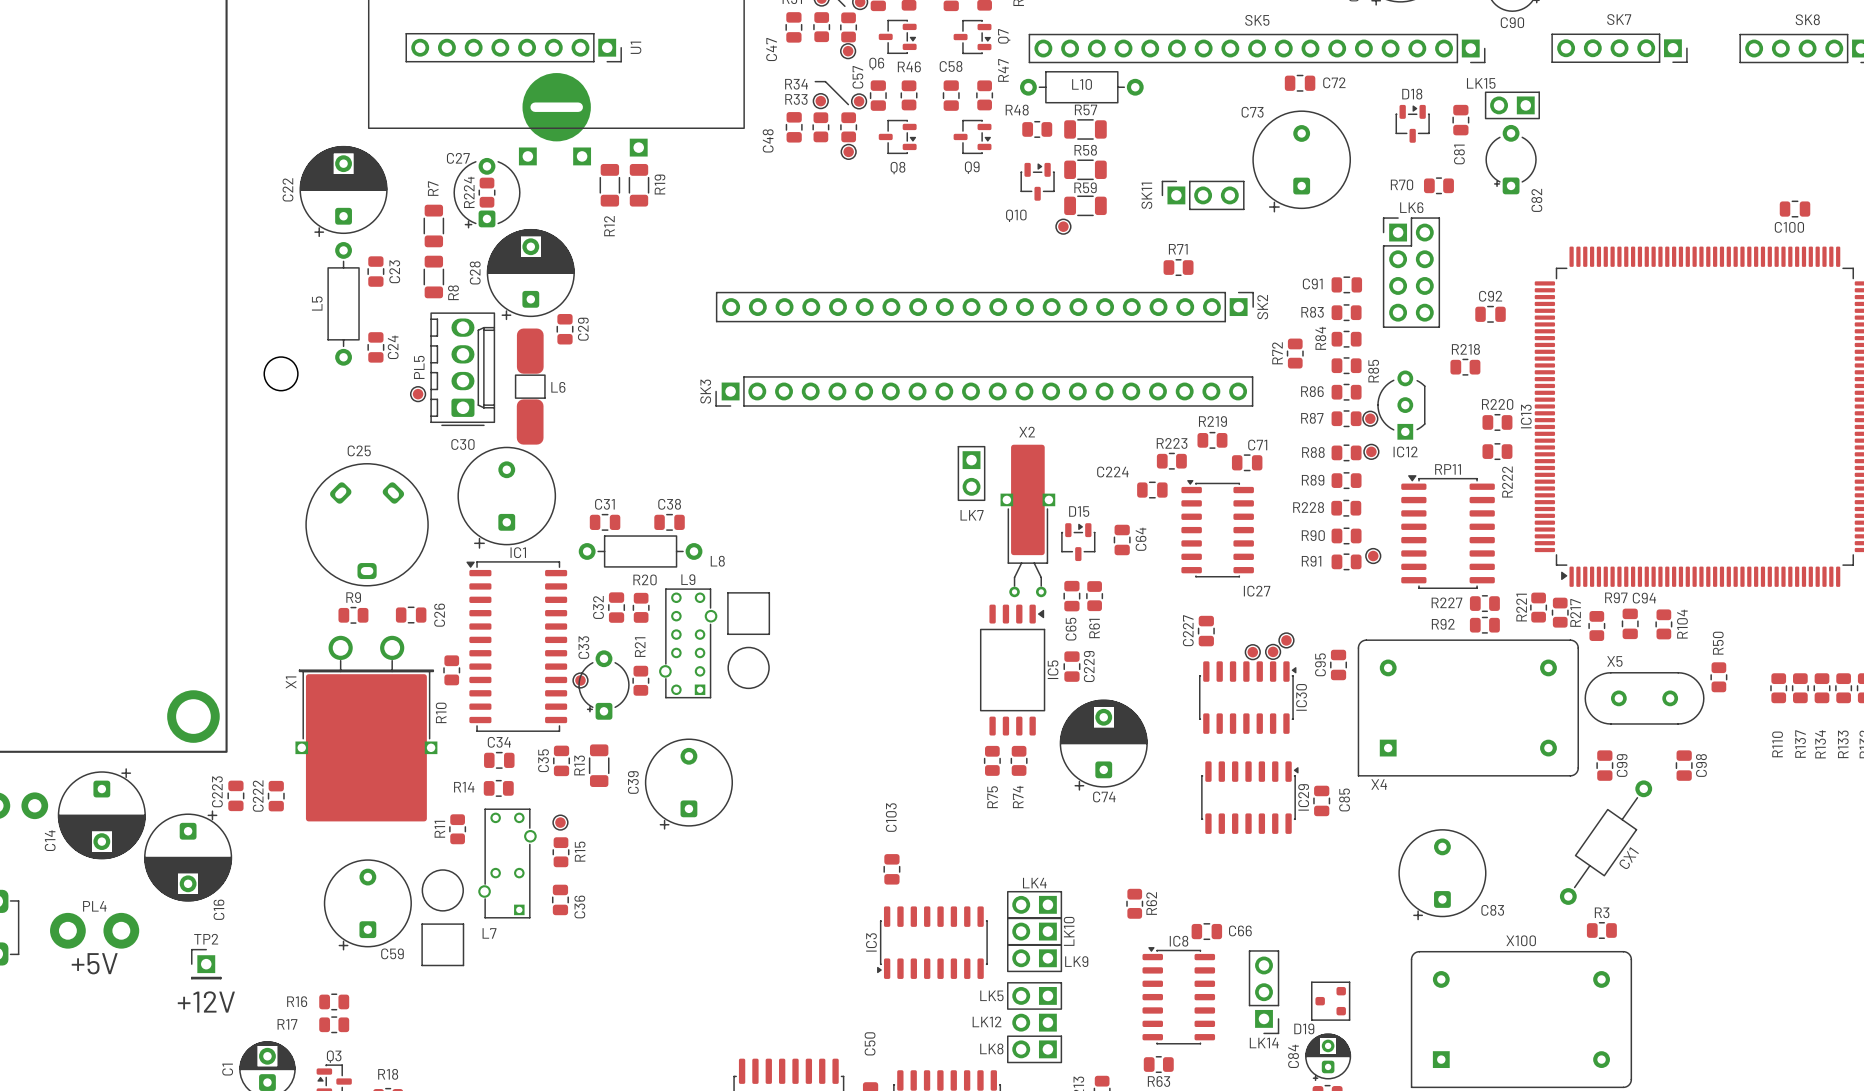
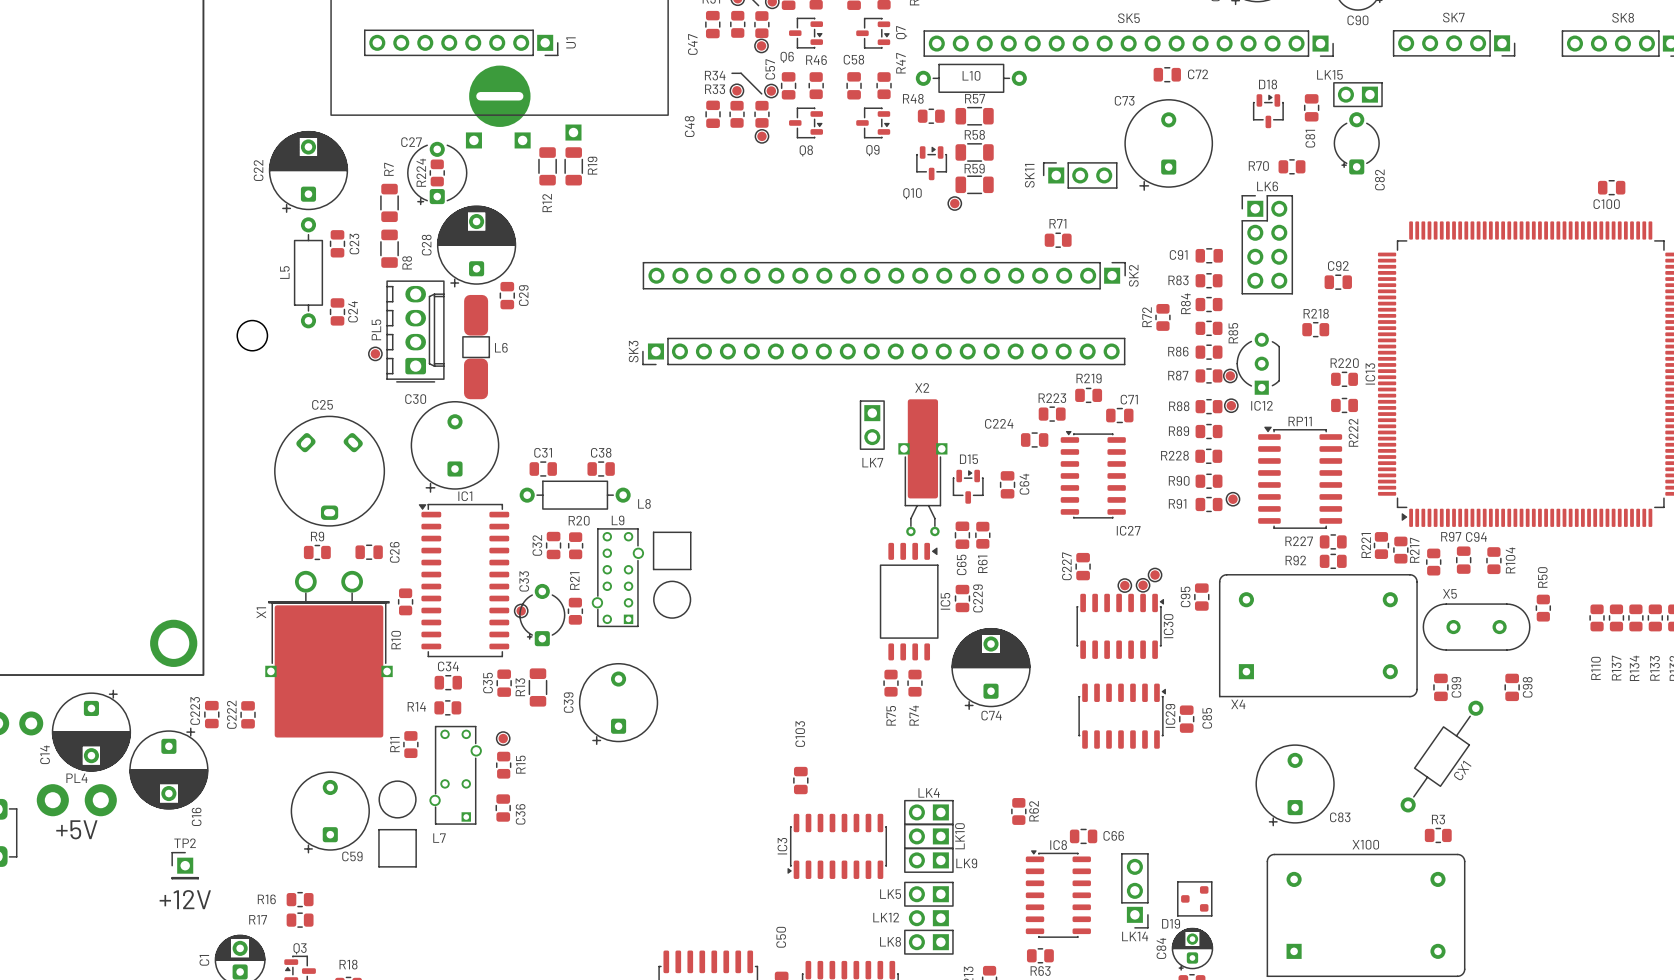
PL4 position: (94, 930) -> (76, 800)

